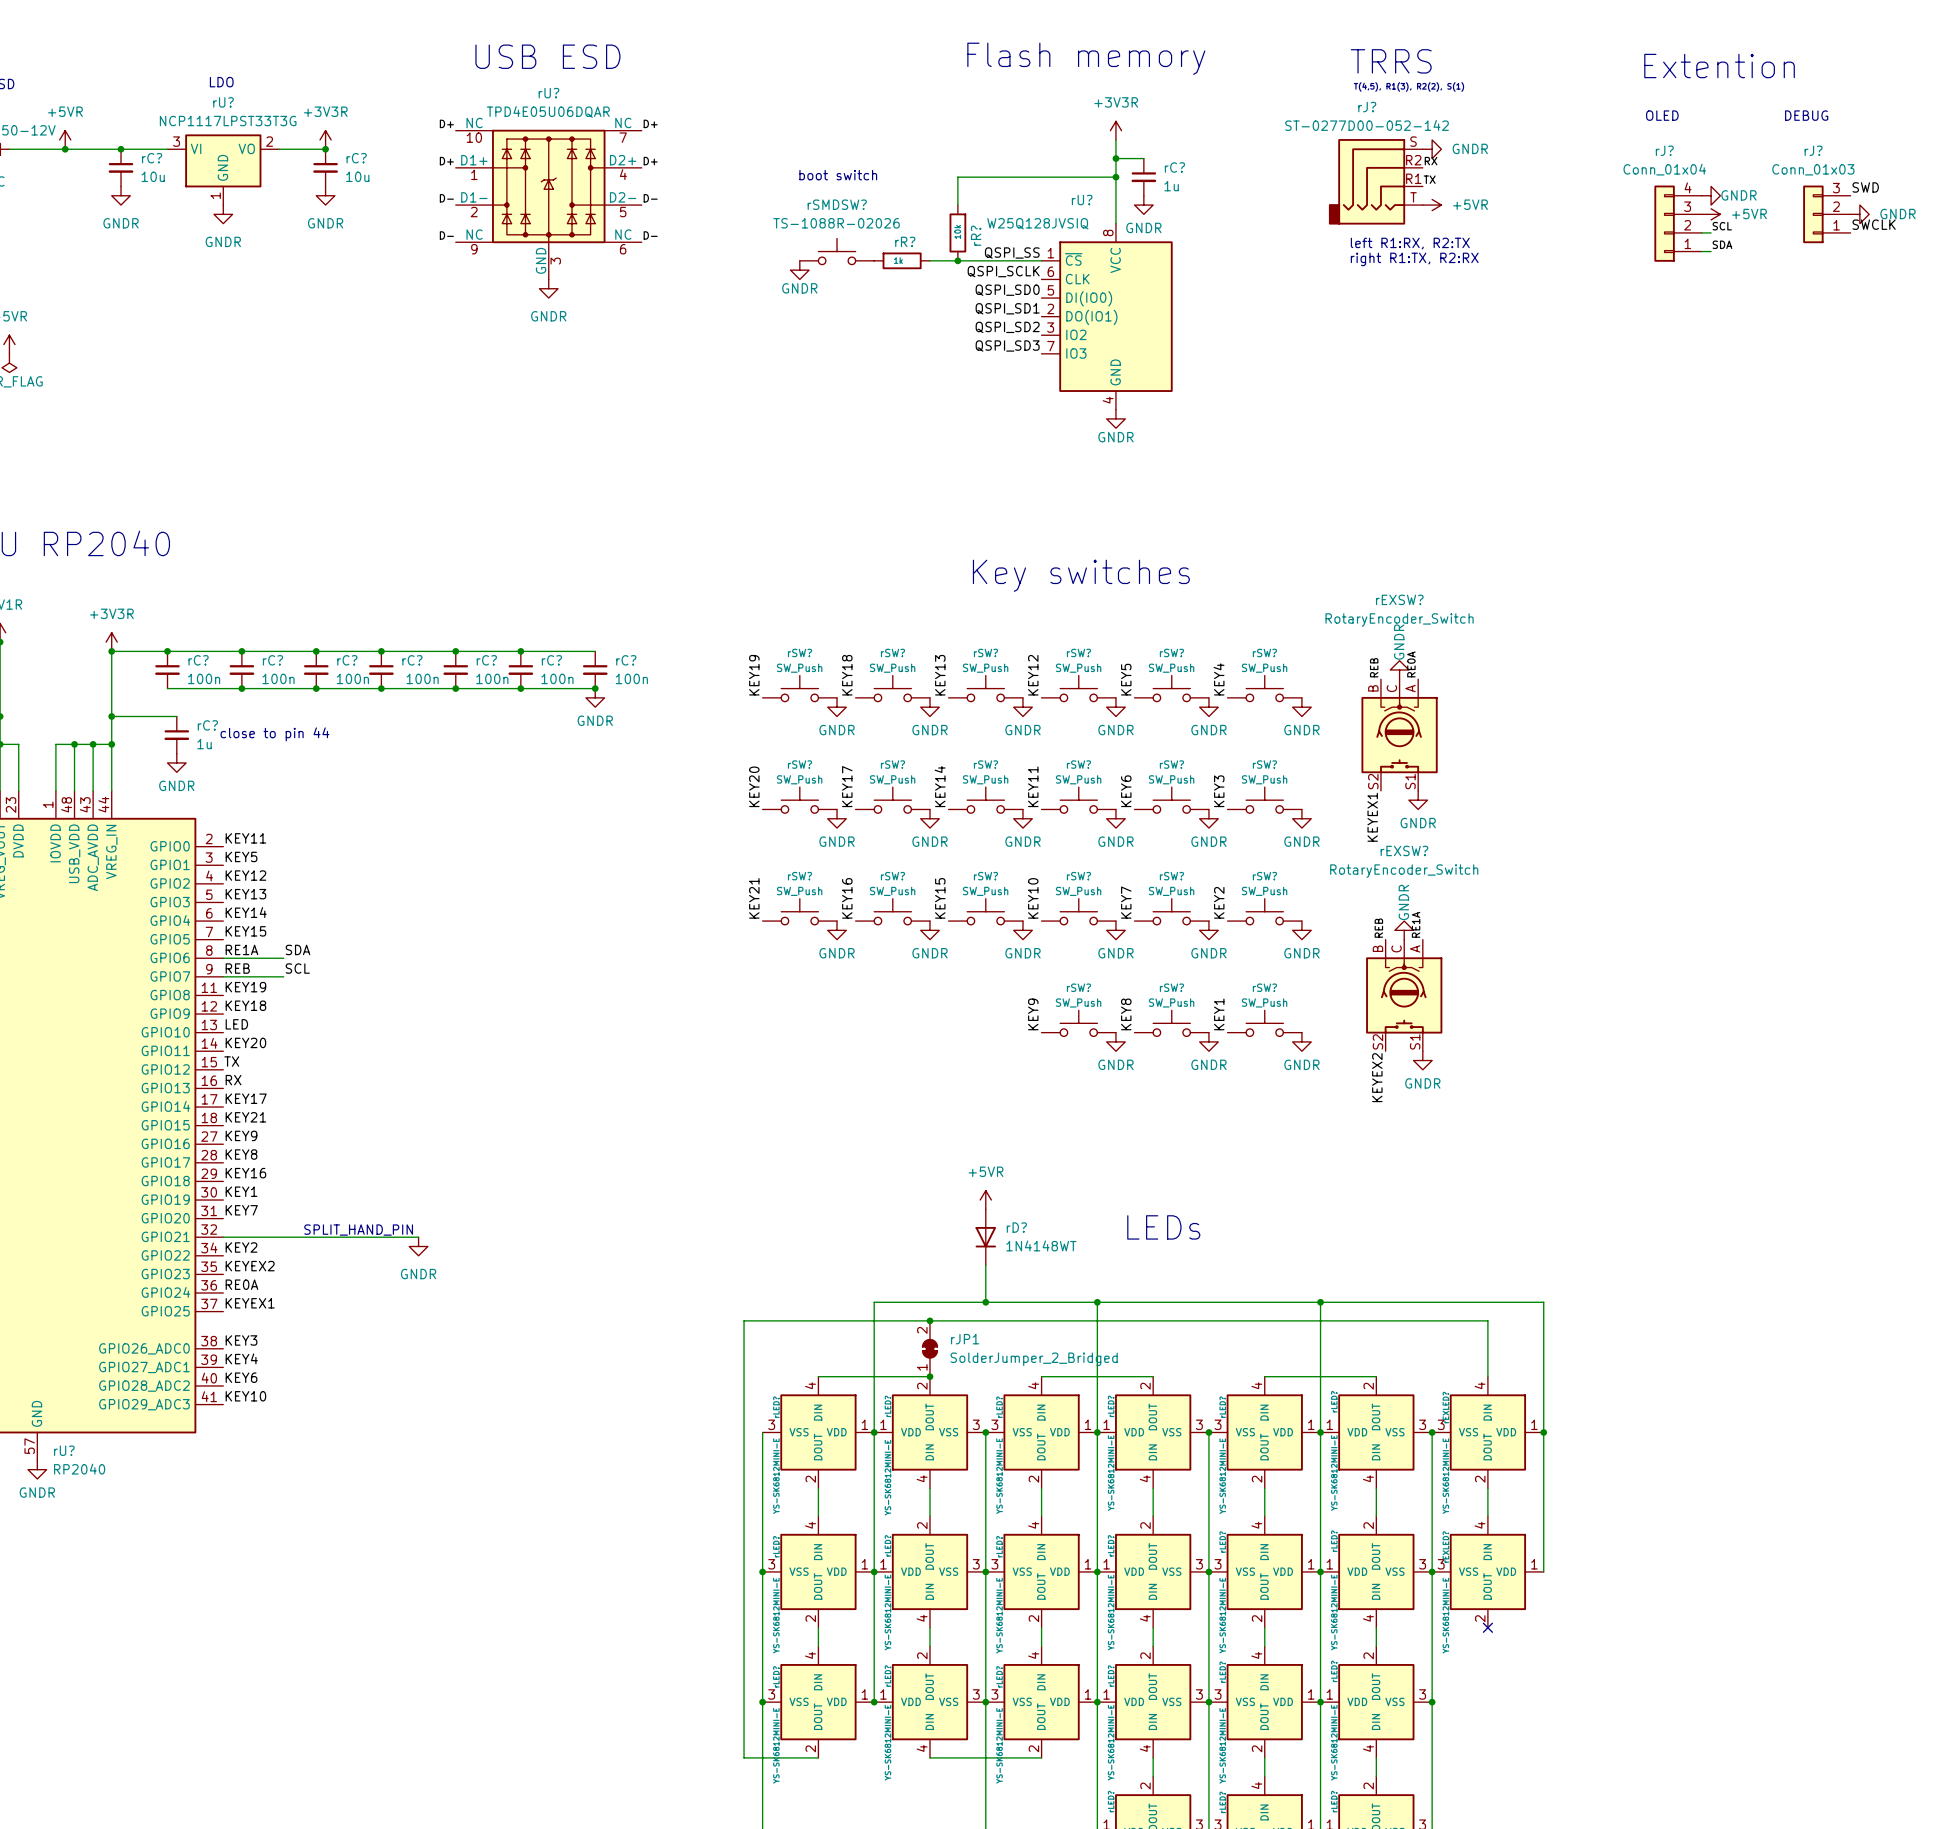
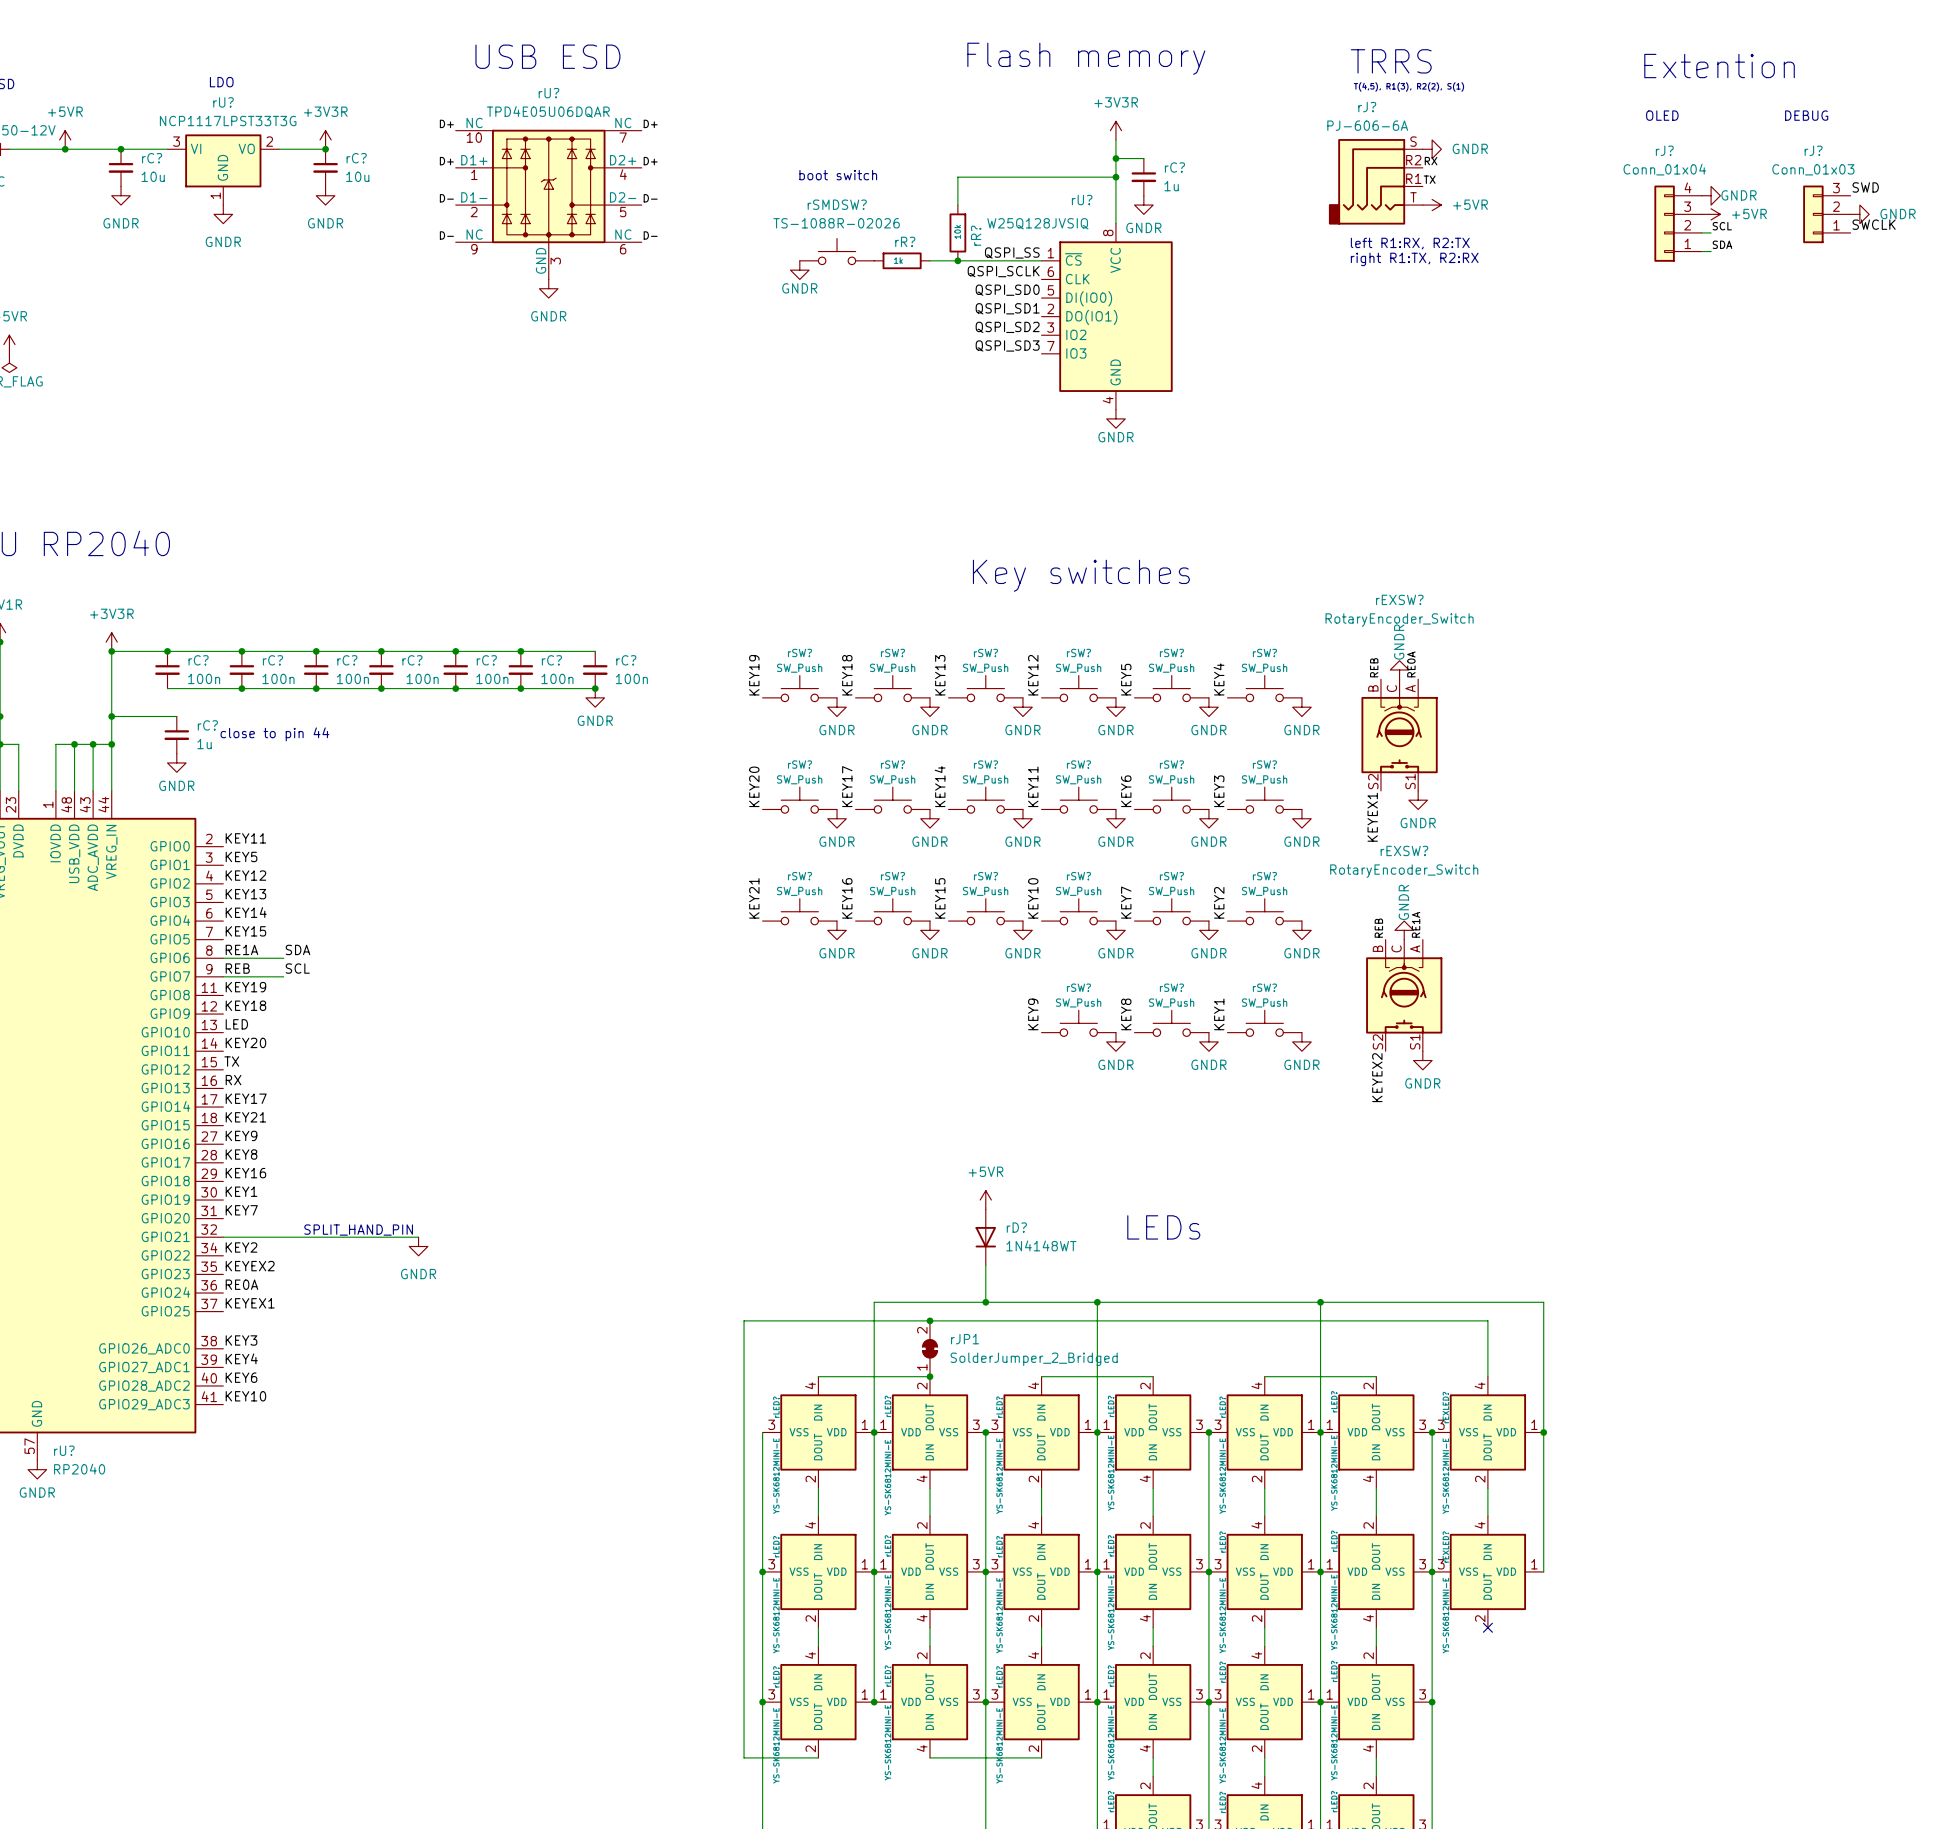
rJ? value: ST-0277D00-052-142 (1367, 125) -> PJ-606-6A (1367, 125)

